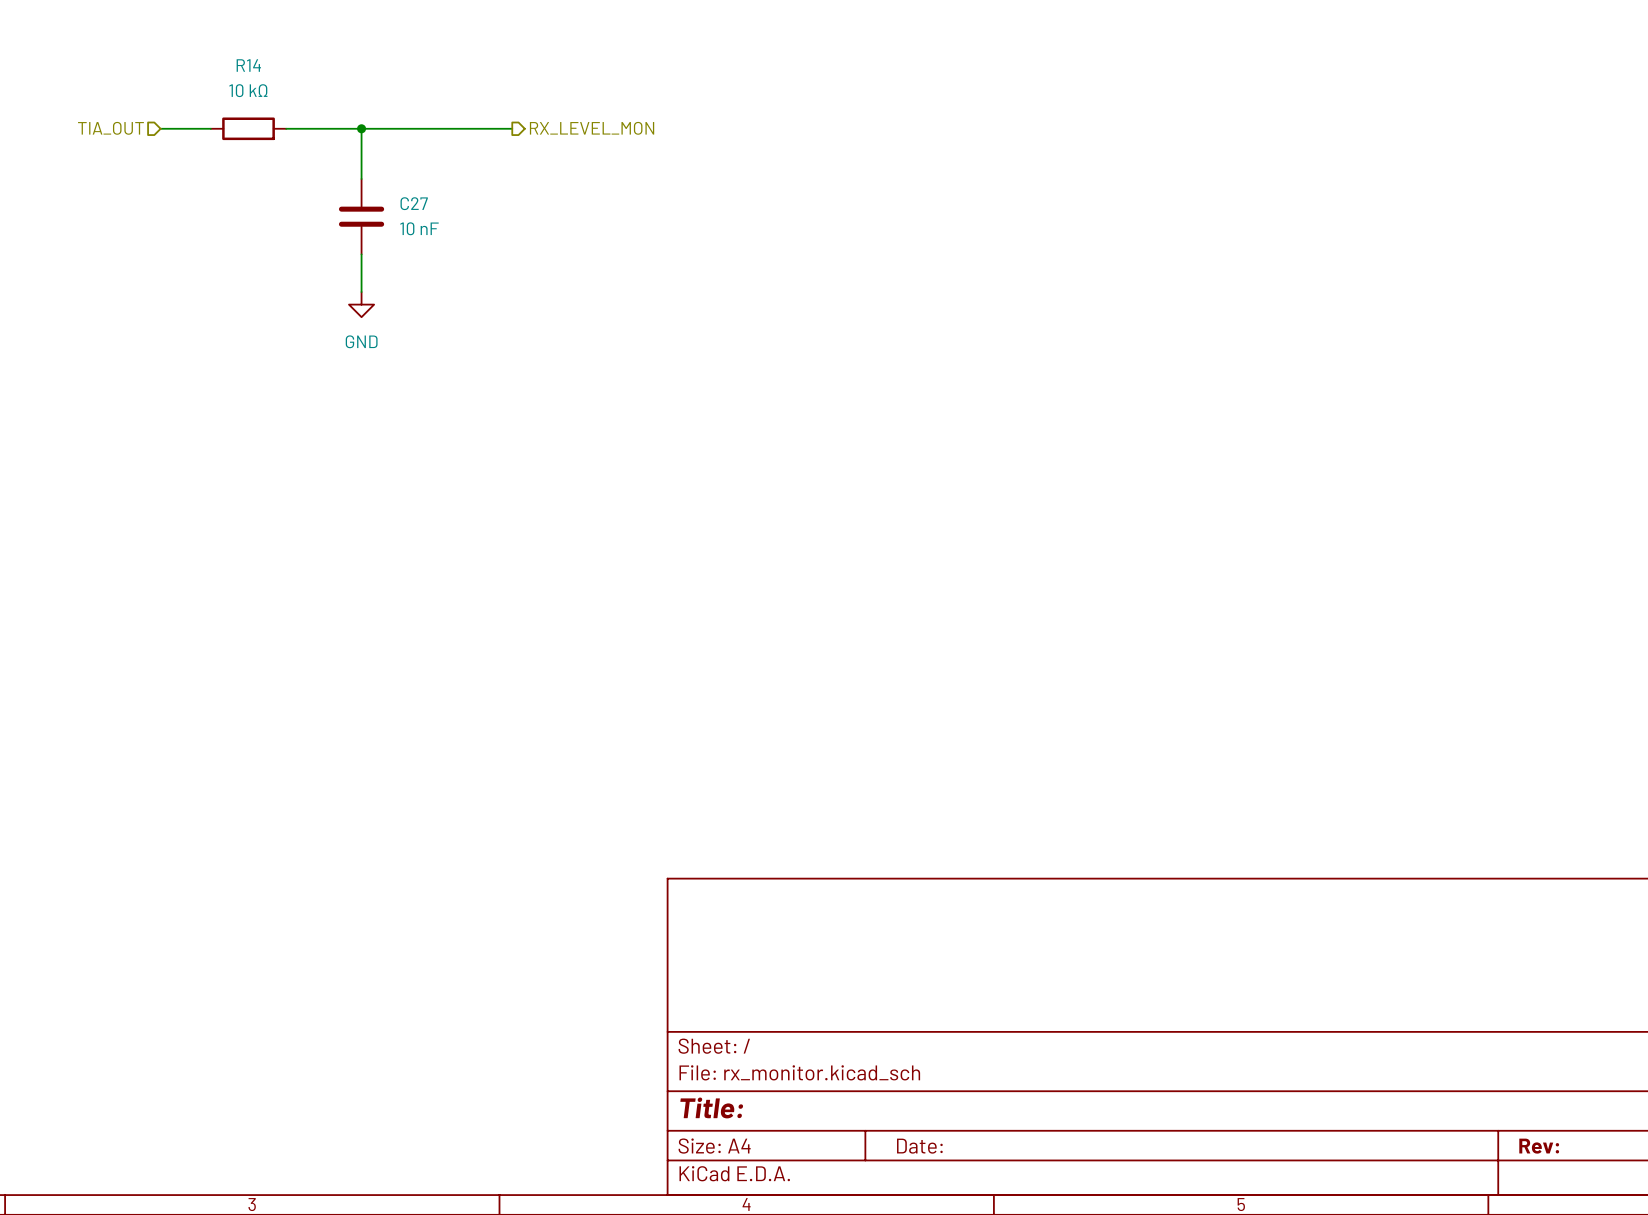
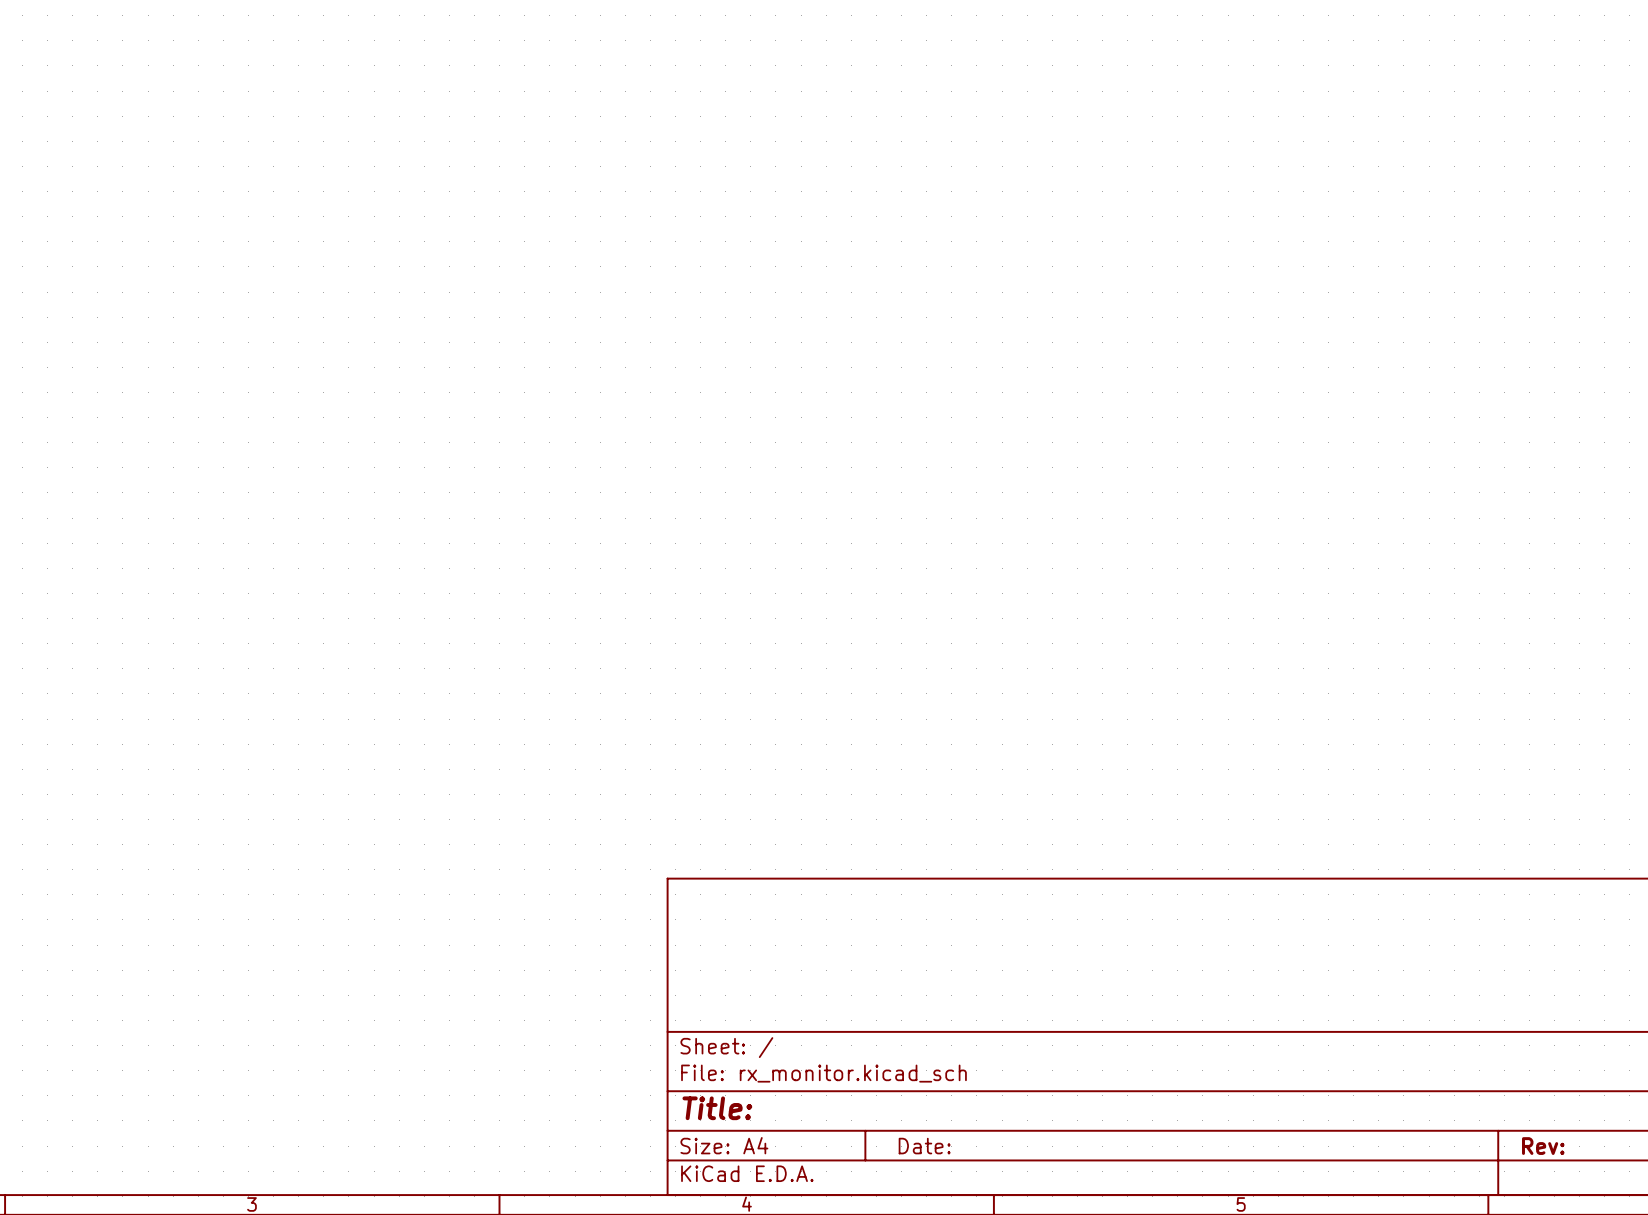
hierarchical label: TIA_OUT (110, 128) -> none
wire: (160, 128) (210, 128) -> none
R14: 10 kΩ (248, 128) -> none
wire: (286, 128) (512, 128) -> none
wire: (361, 128) (361, 179) -> none
junction: (361, 128) -> none
hierarchical label: RX_LEVEL_MON (592, 128) -> none
C27: 10 nF (361, 216) -> none
wire: (361, 254) (361, 292) -> none
power symbol: GND (361, 304) -> none

